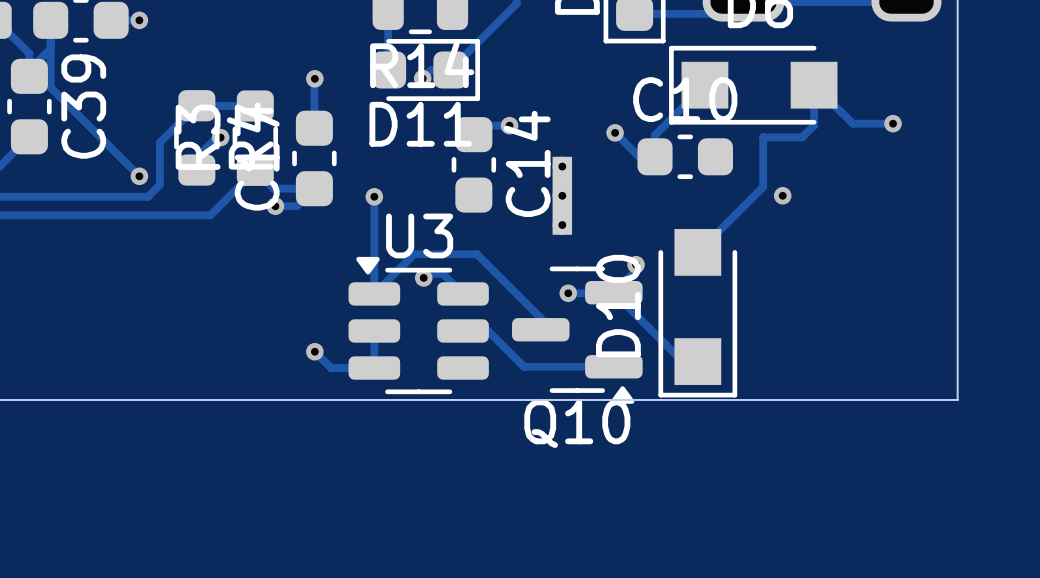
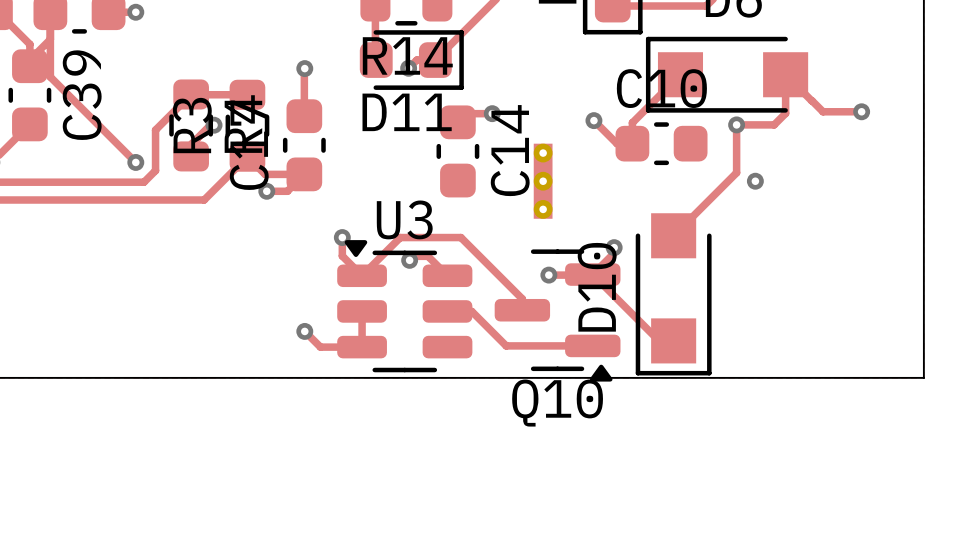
via: none -> (736, 124)
track: (374, 196) (374, 293) -> (342, 237) (342, 256) (362, 275)
via position: (374, 196) -> (342, 237)

